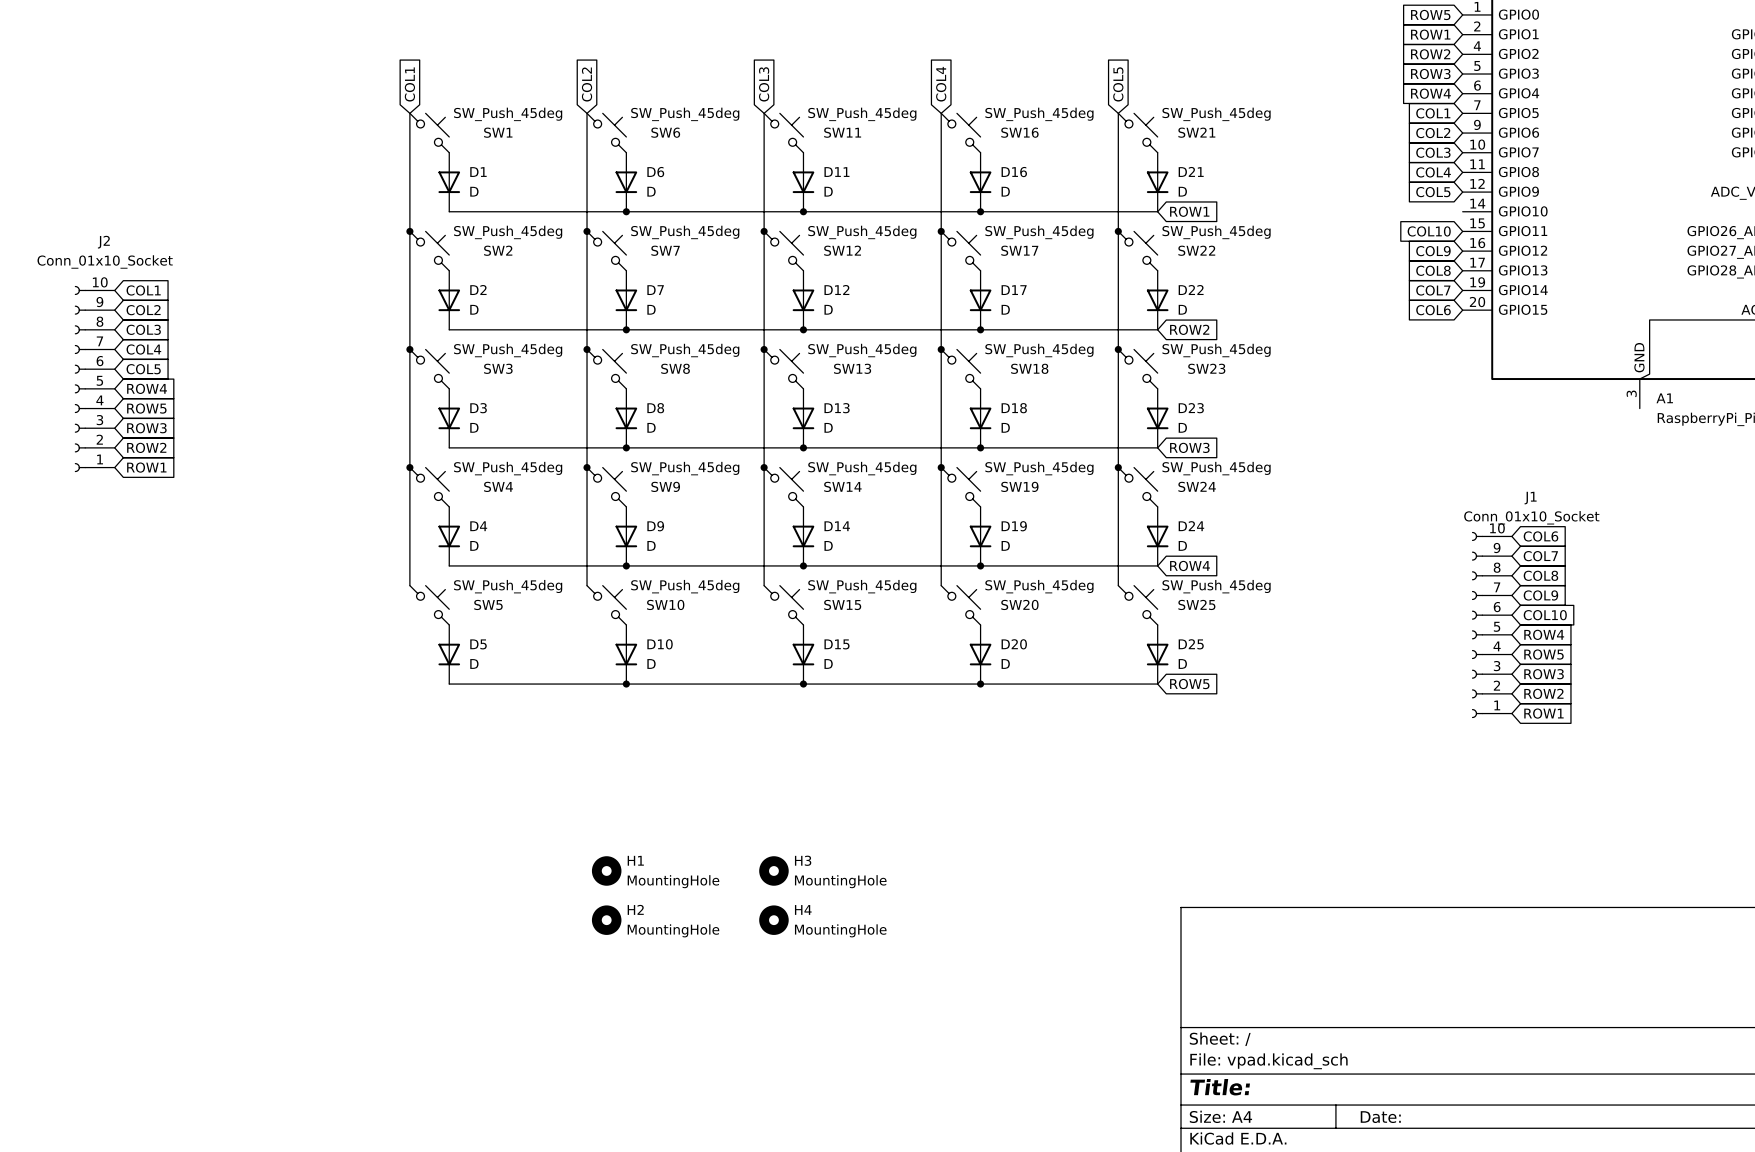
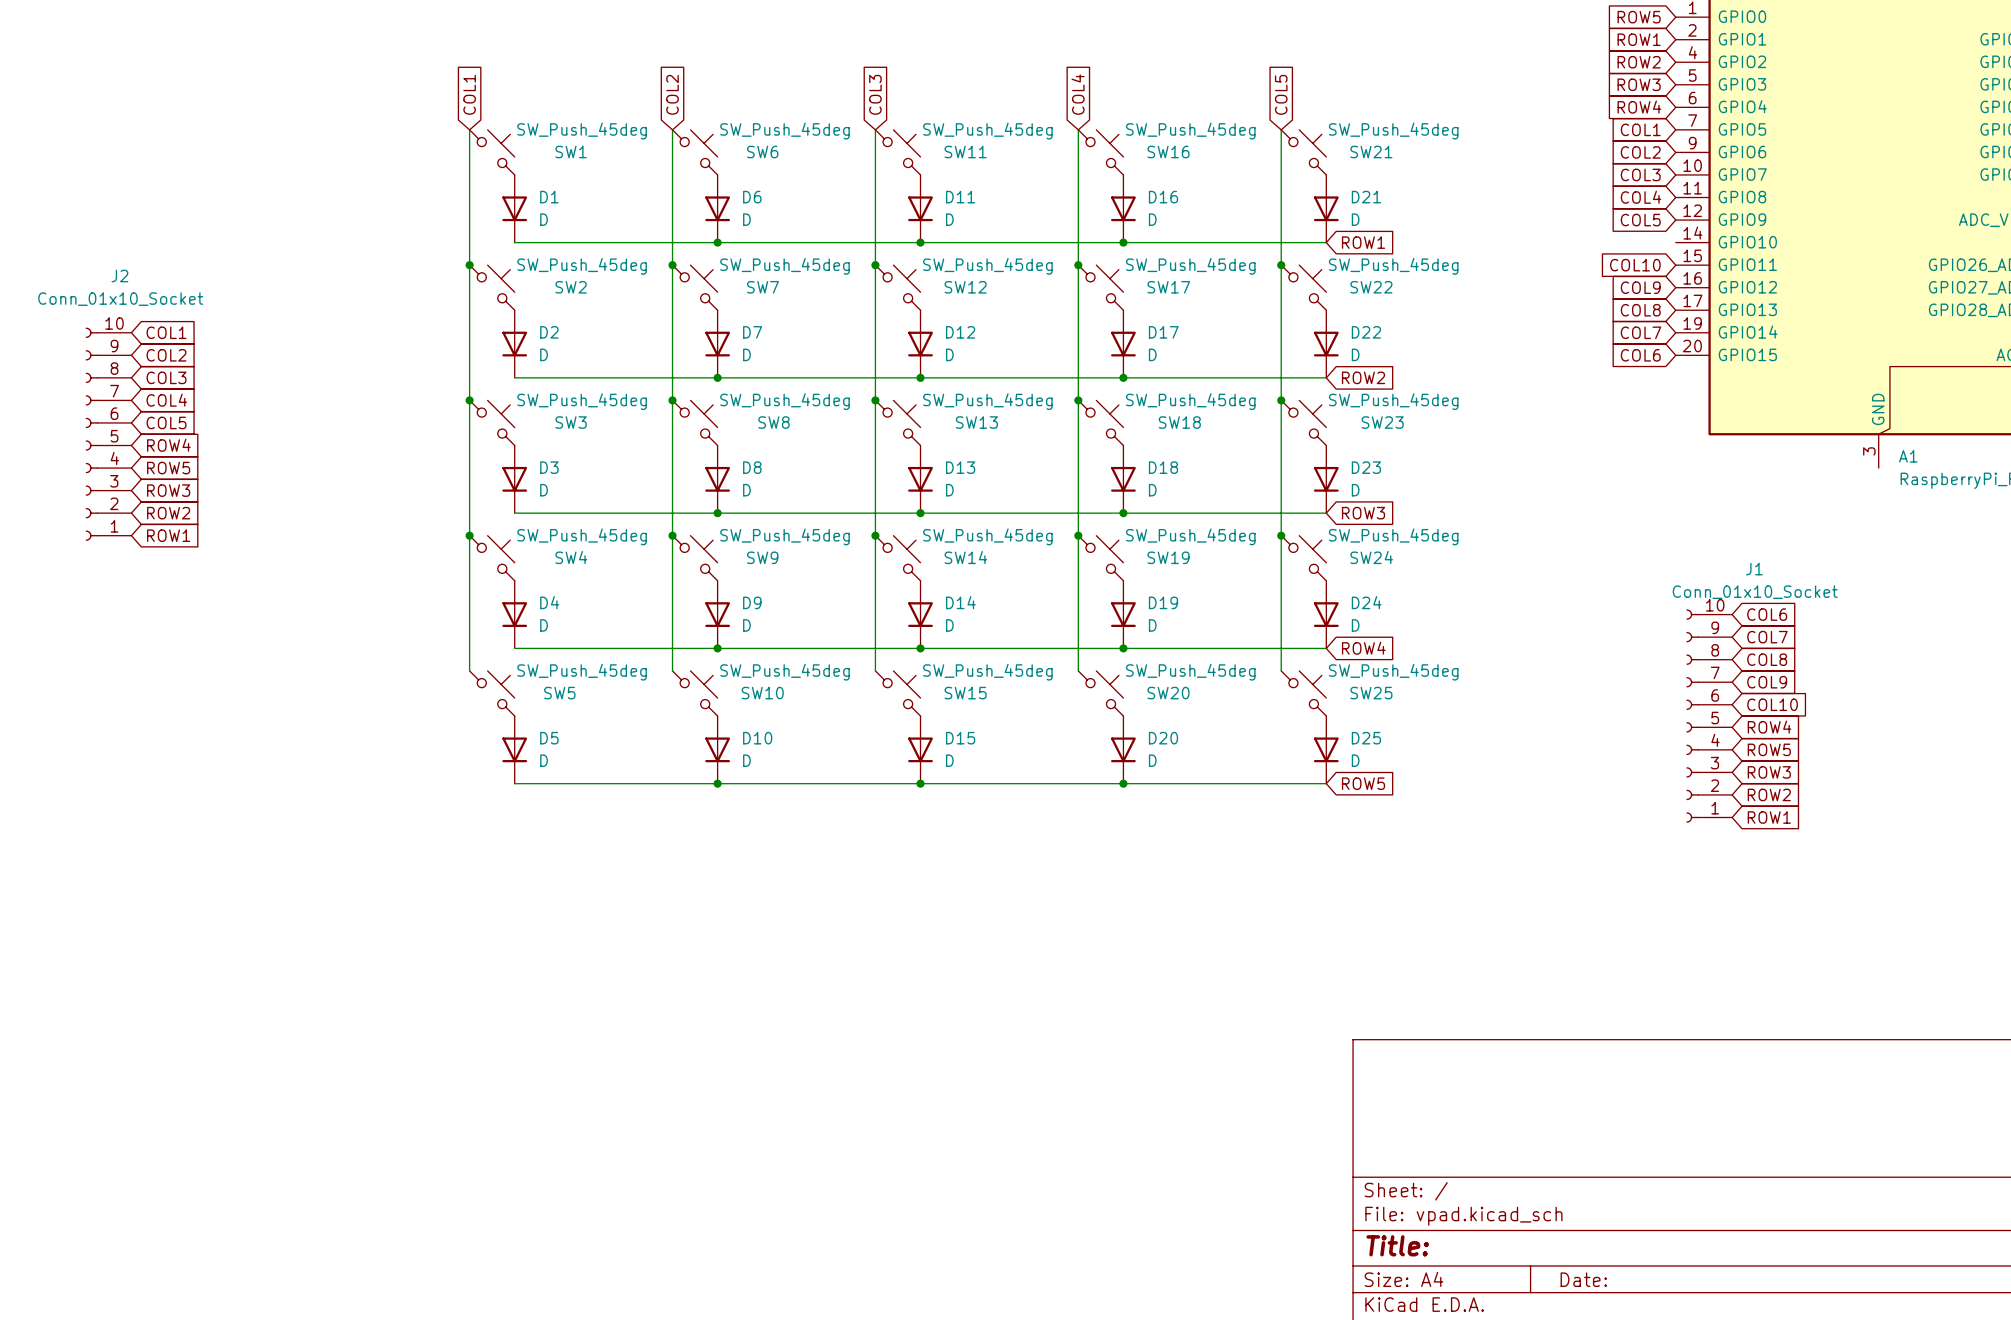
H1: MountingHole (606, 870) -> none
H3: MountingHole (773, 870) -> none
H2: MountingHole (606, 920) -> none
H4: MountingHole (773, 920) -> none

